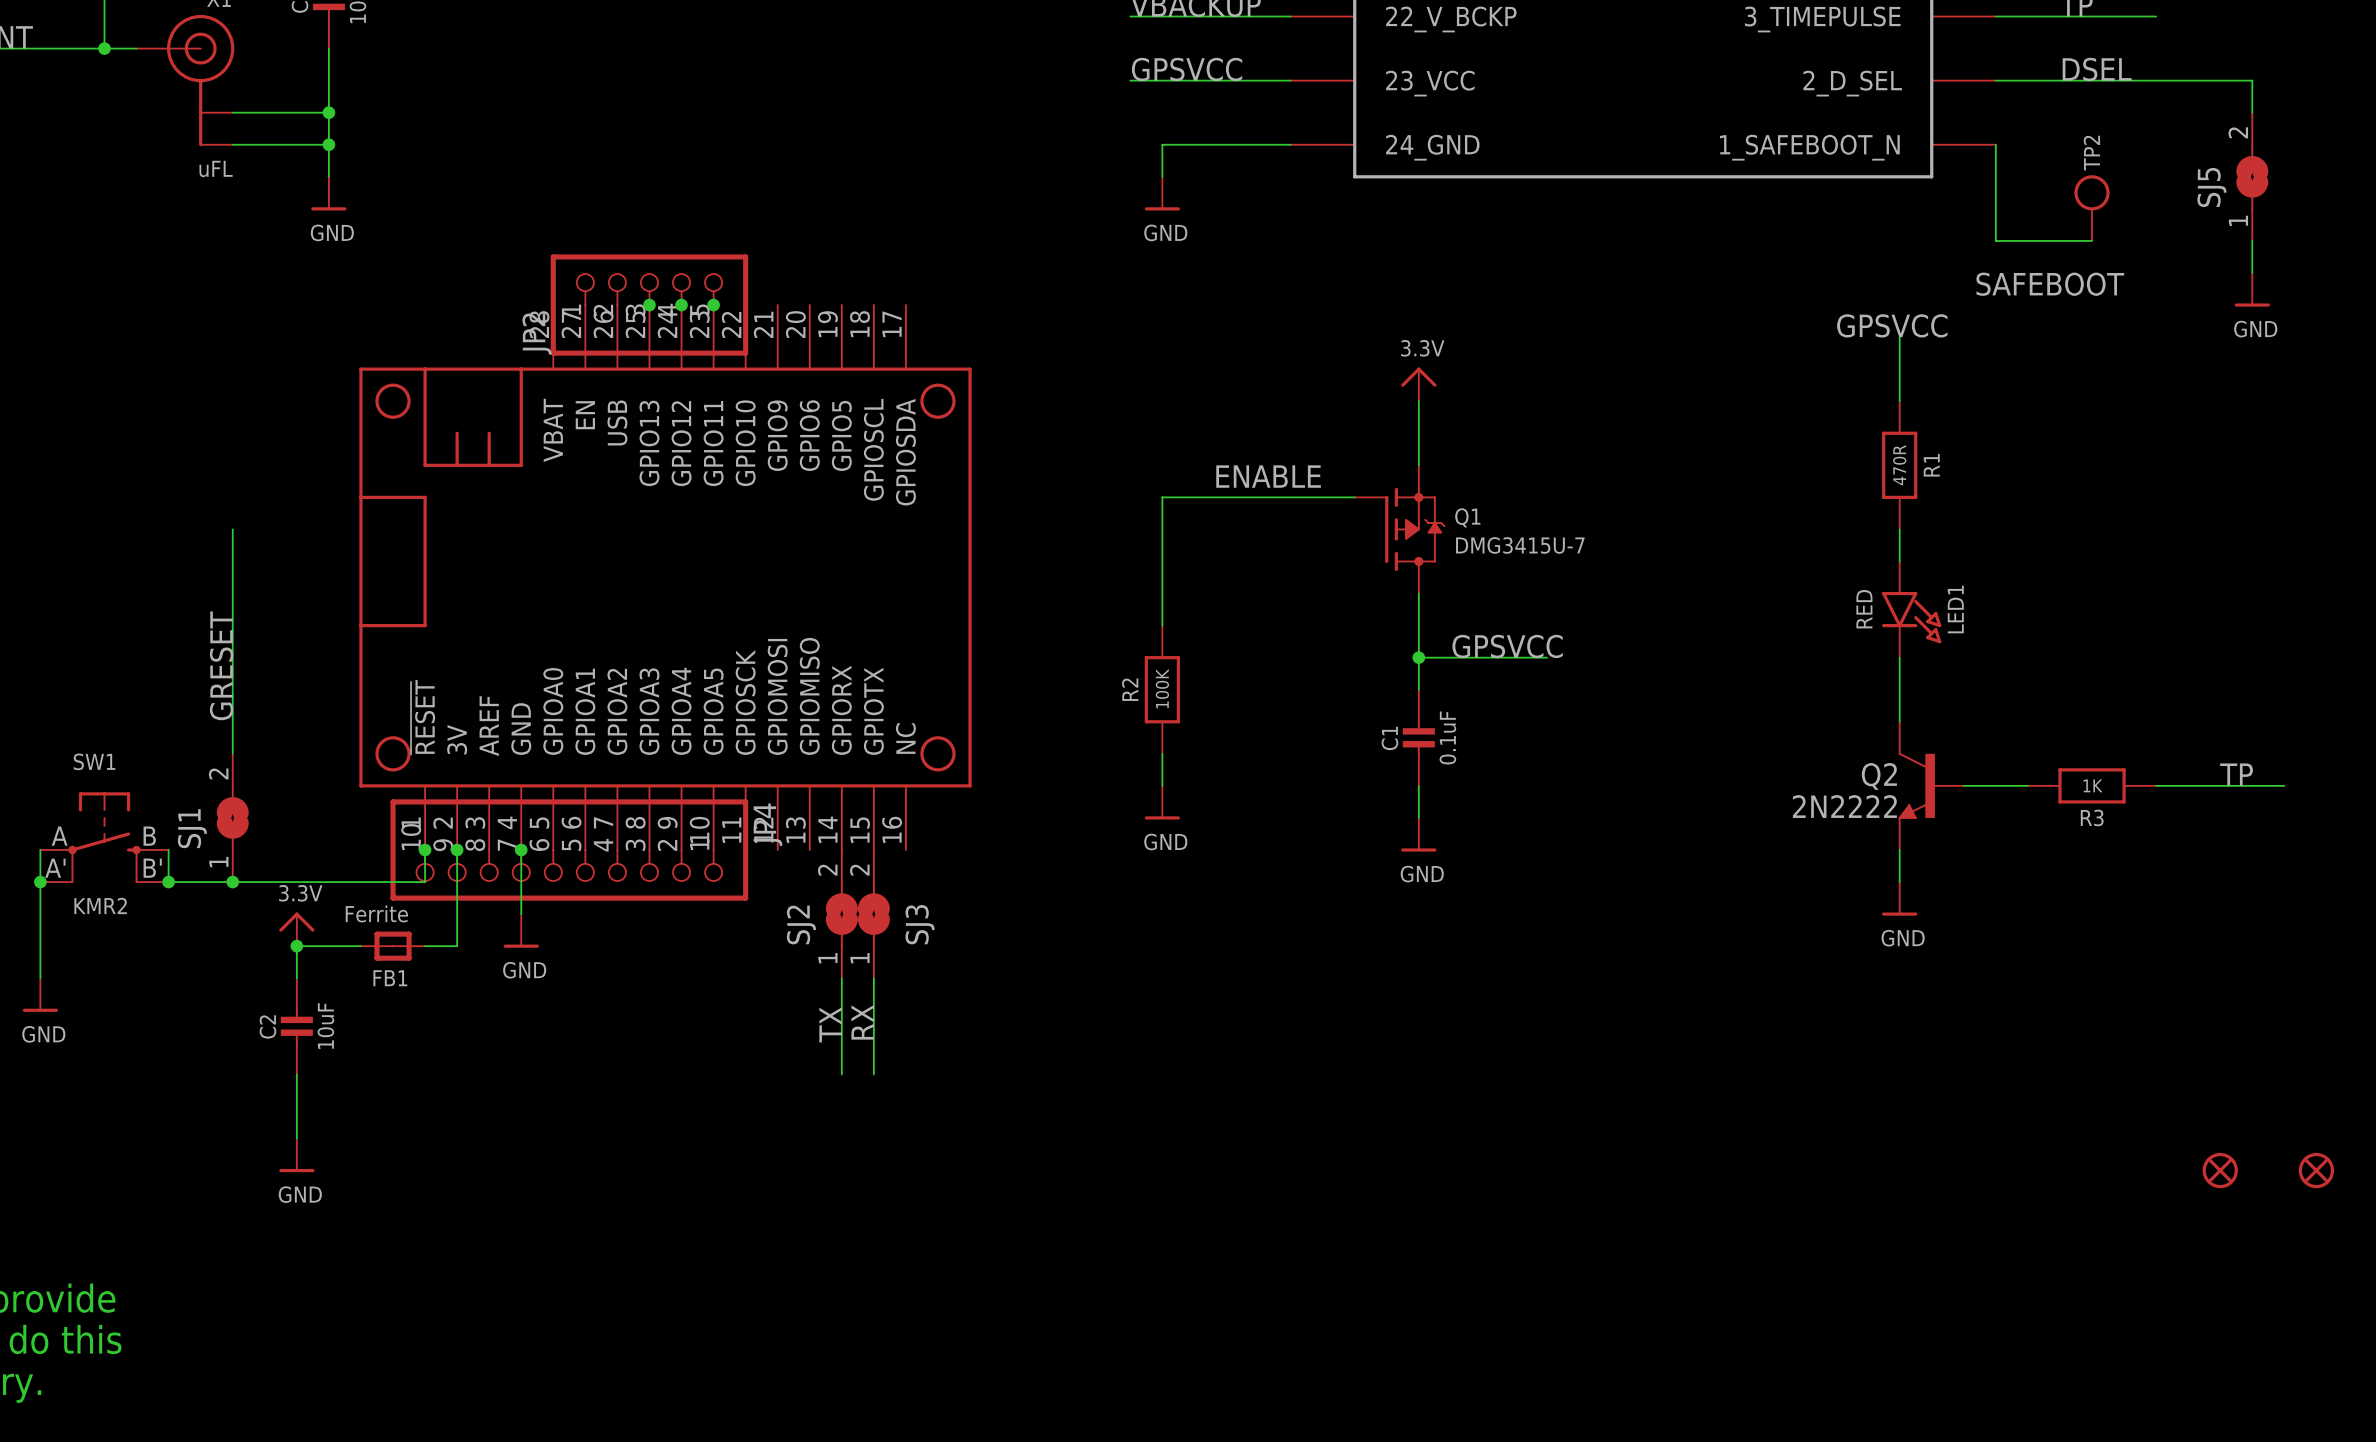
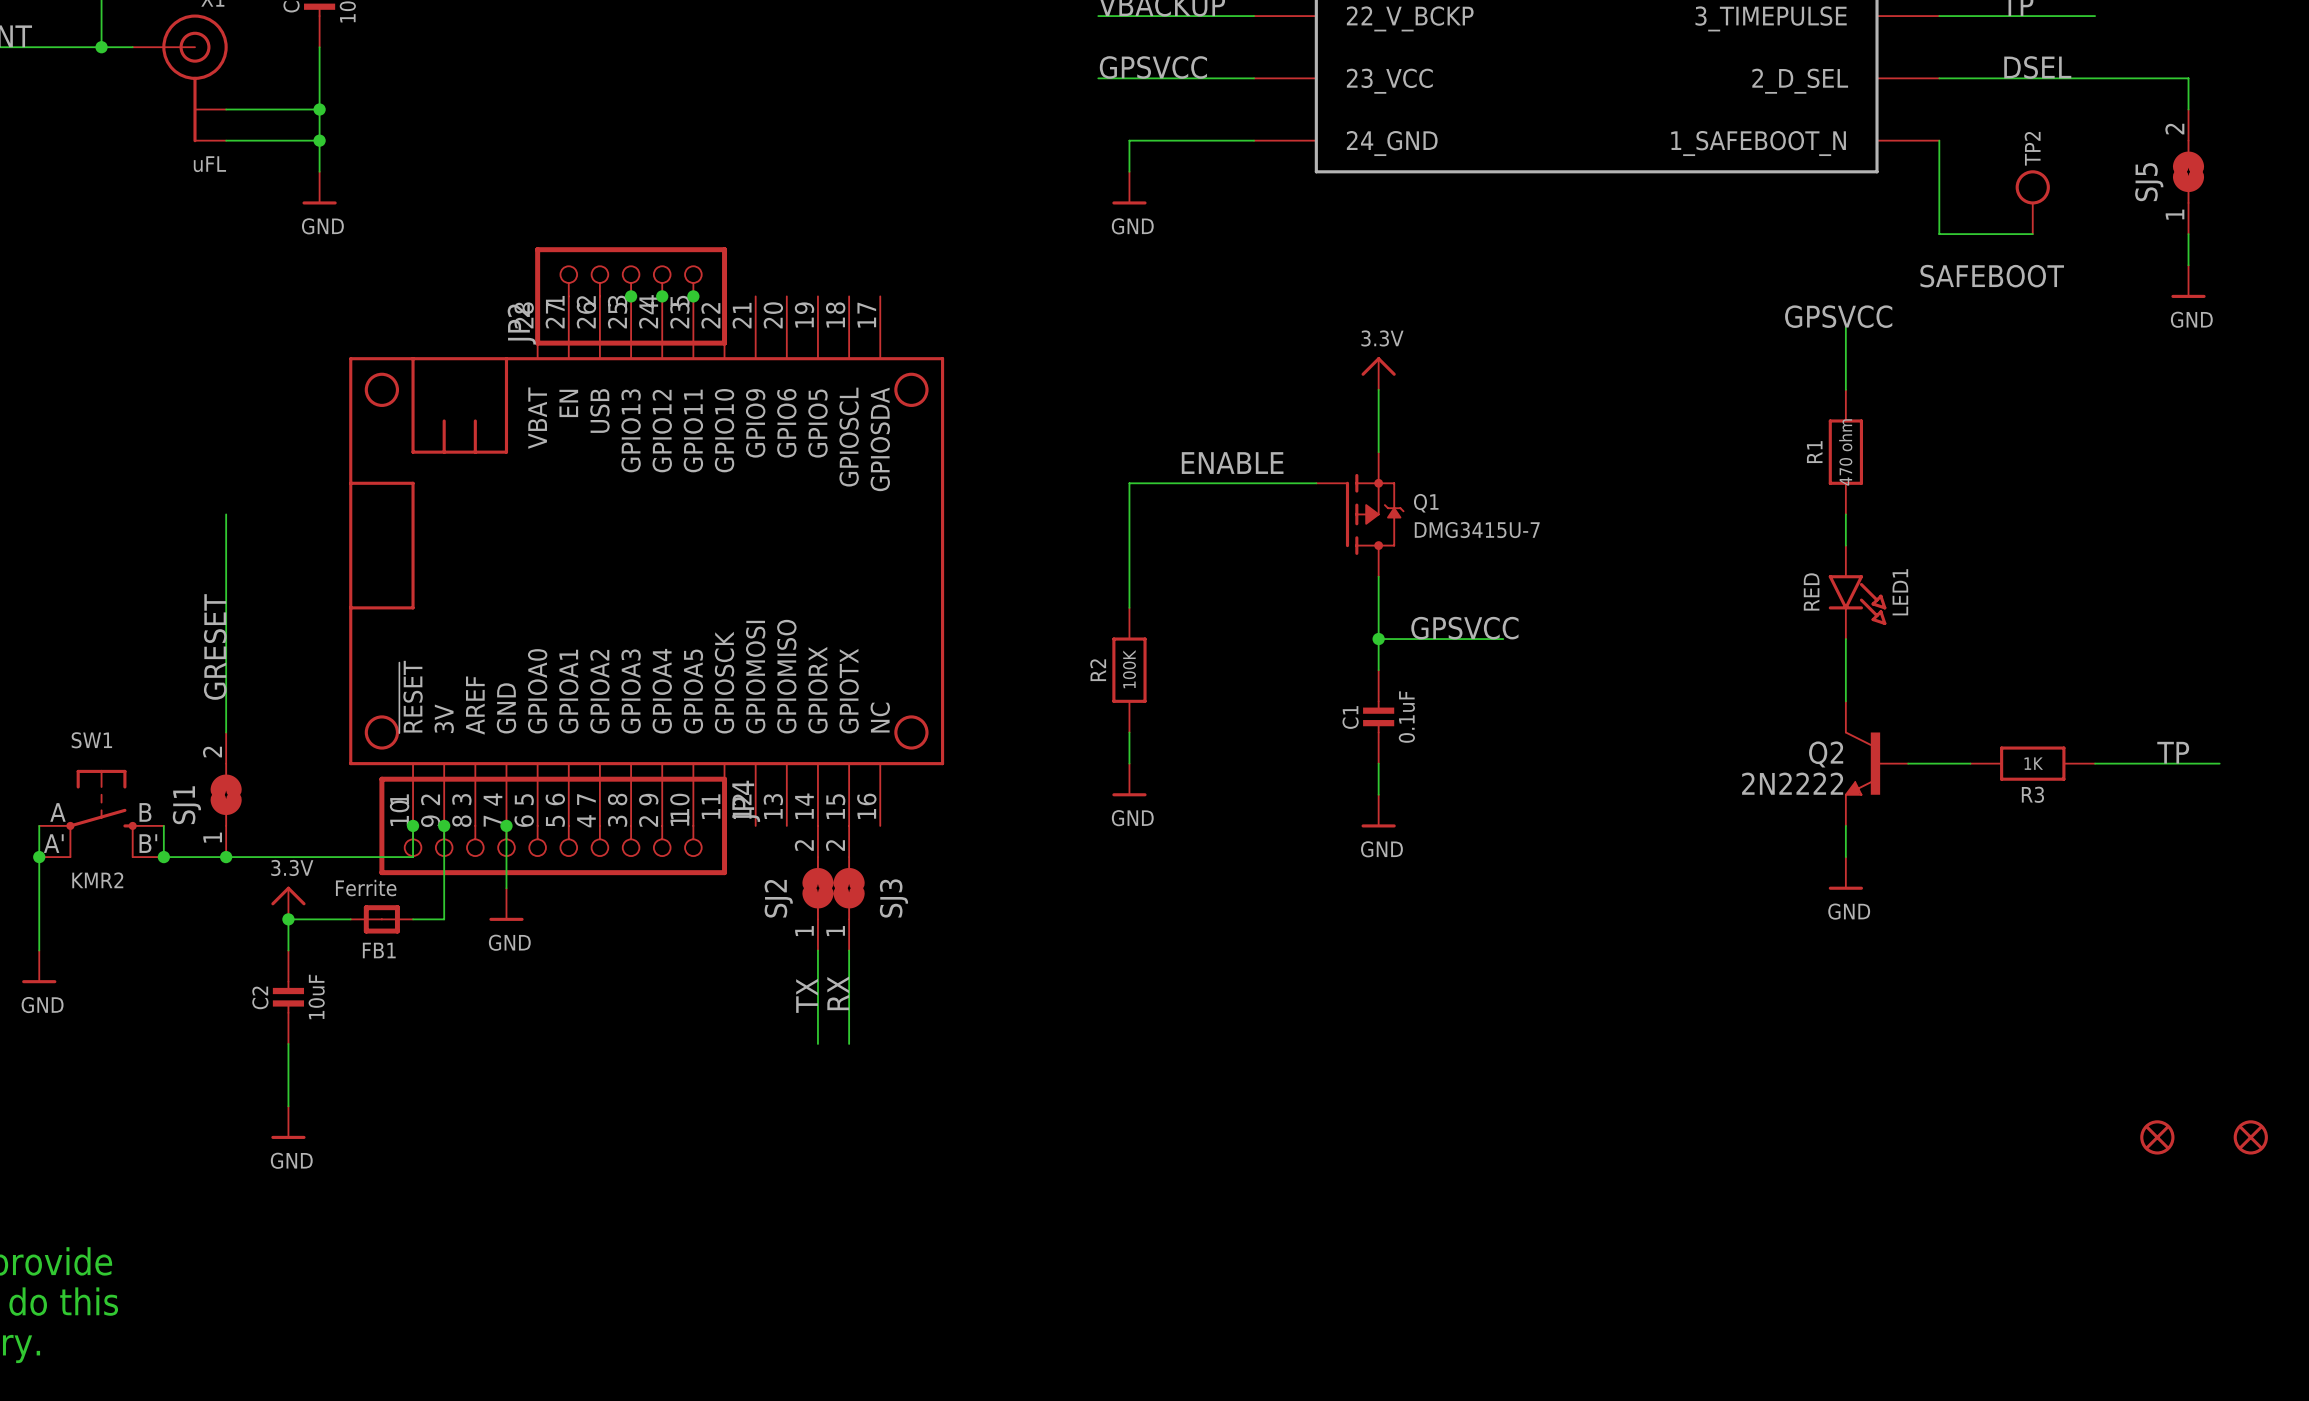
R1 value: 470R (1899, 465) -> 470 ohm (1845, 452)
R1 name position: R1 (1931, 465) -> R1 (1814, 452)

